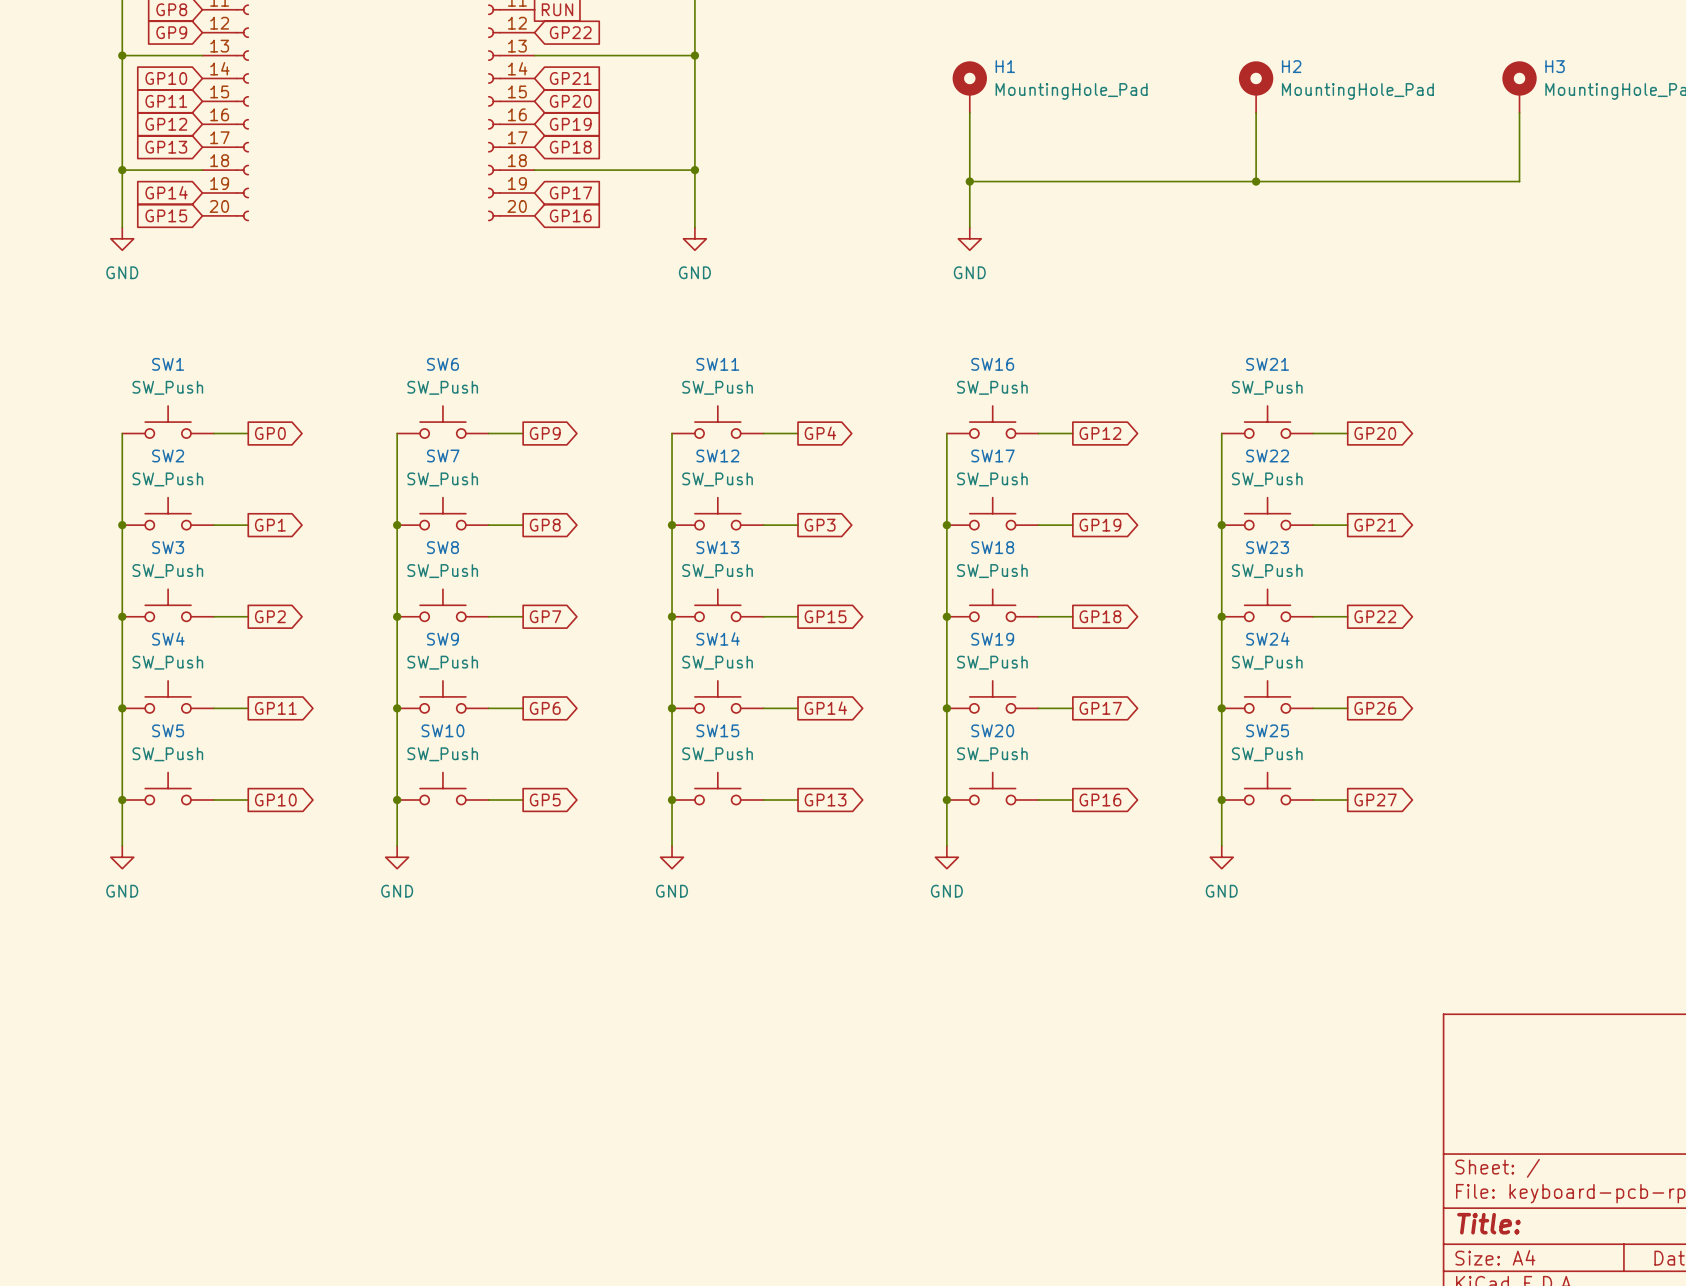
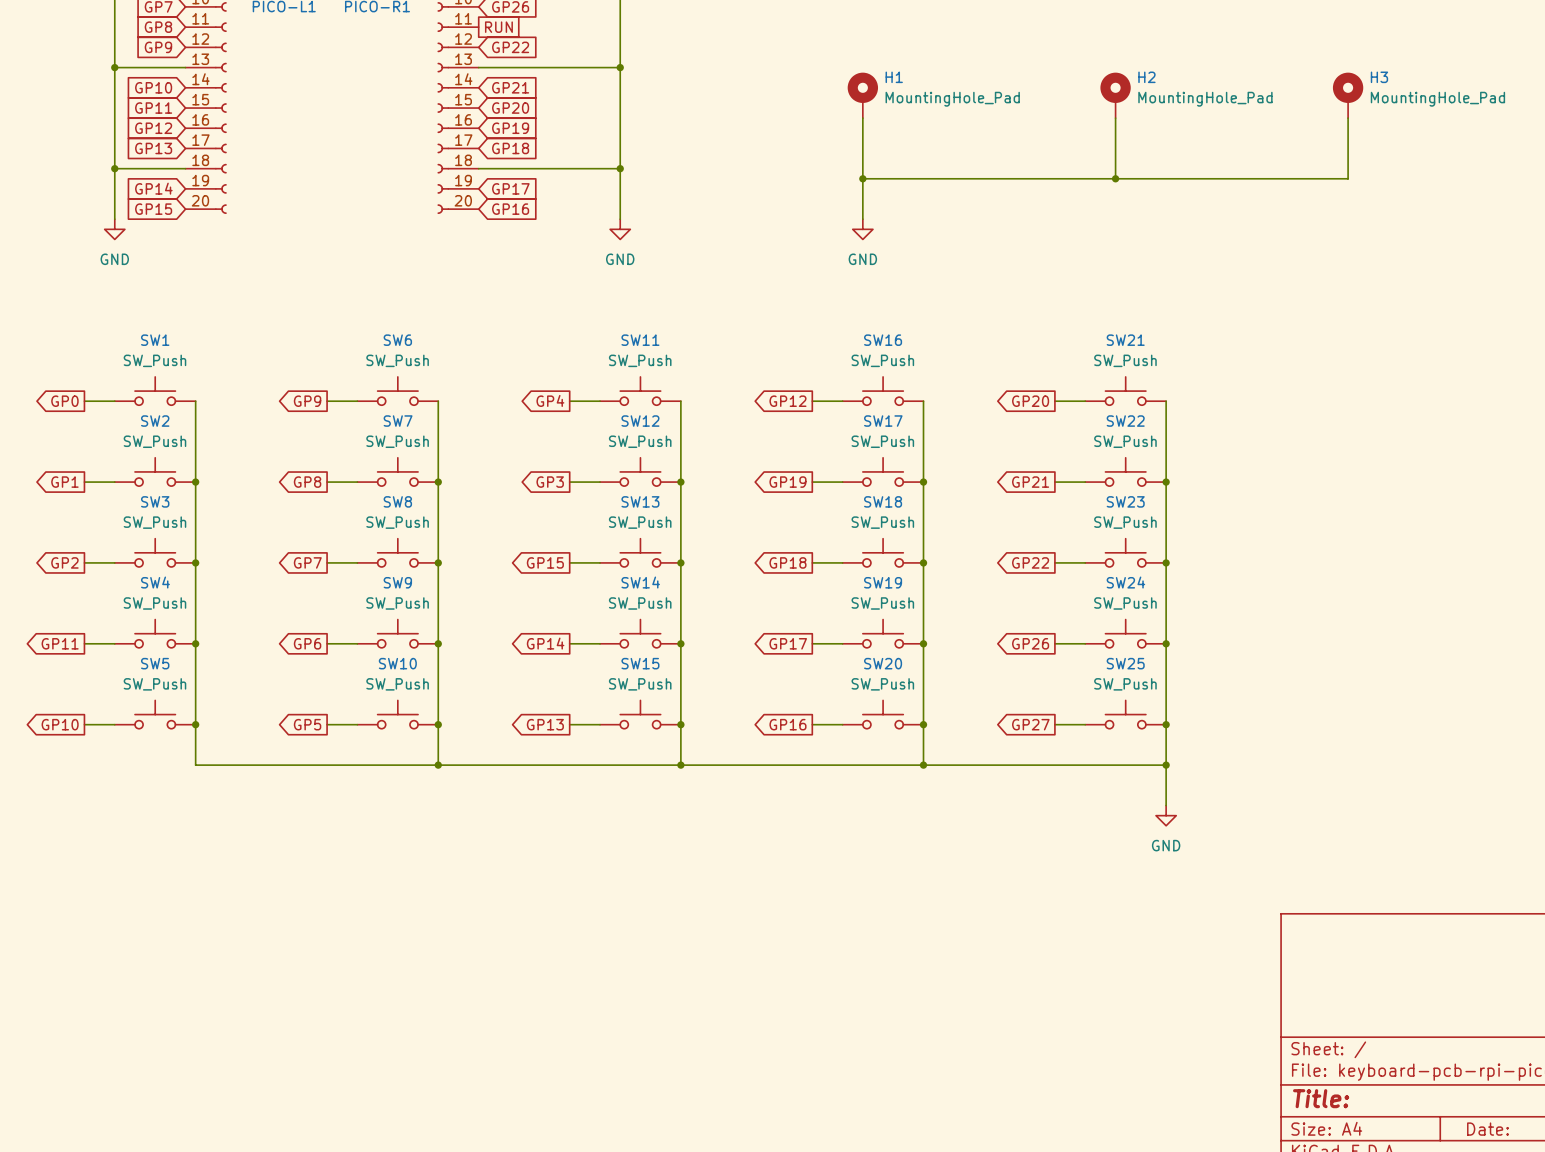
wire: (122, 433) (122, 845) -> (114, 401) (84, 401)
wire: (213, 433) (248, 433) -> (195, 401) (195, 765) (1166, 765)
global label rotation: 0° (270, 433) -> 180° (64, 401)
global label position: GP0 (270, 433) -> GP0 (64, 401)
wire: (397, 433) (397, 845) -> (357, 401) (327, 401)
wire: (488, 433) (523, 433) -> (438, 401) (438, 765)
global label rotation: 0° (545, 433) -> 180° (307, 401)
global label position: GP9 (545, 433) -> GP9 (307, 401)
wire: (672, 433) (672, 845) -> (600, 401) (569, 401)
wire: (763, 433) (797, 433) -> (680, 401) (680, 765)
global label rotation: 0° (820, 433) -> 180° (550, 400)
global label position: GP4 (820, 433) -> GP4 (550, 400)
wire: (946, 433) (946, 845) -> (842, 401) (812, 401)
wire: (1038, 433) (1072, 433) -> (923, 401) (923, 765)
global label rotation: 0° (1100, 433) -> 180° (787, 401)
global label position: GP12 (1100, 433) -> GP12 (787, 401)
wire: (1221, 433) (1221, 845) -> (1085, 401) (1054, 401)
wire: (1313, 433) (1347, 433) -> (1166, 401) (1166, 805)
global label rotation: 0° (1375, 433) -> 180° (1030, 401)
global label position: GP20 (1375, 433) -> GP20 (1030, 401)
junction: (122, 525) -> none
wire: (213, 525) (248, 525) -> (84, 482) (114, 482)
junction: none -> (195, 482)
global label rotation: 0° (270, 525) -> 180° (64, 482)
global label position: GP1 (270, 525) -> GP1 (64, 482)
junction: (397, 525) -> none
wire: (488, 525) (523, 525) -> (327, 482) (357, 482)
junction: none -> (438, 482)
global label rotation: 0° (545, 525) -> 180° (307, 482)
global label position: GP8 (545, 525) -> GP8 (307, 482)
junction: (672, 525) -> none
wire: (763, 525) (797, 525) -> (569, 482) (600, 482)
junction: none -> (680, 482)
global label rotation: 0° (820, 525) -> 180° (550, 482)
global label position: GP3 (820, 525) -> GP3 (550, 482)
junction: (946, 525) -> none
wire: (1038, 525) (1072, 525) -> (812, 482) (842, 482)
junction: none -> (923, 482)
global label rotation: 0° (1100, 525) -> 180° (787, 482)
global label position: GP19 (1100, 525) -> GP19 (787, 482)
junction: (1221, 525) -> none
wire: (1313, 525) (1347, 525) -> (1054, 482) (1085, 482)
junction: none -> (1166, 482)
global label rotation: 0° (1375, 525) -> 180° (1030, 482)
global label position: GP21 (1375, 525) -> GP21 (1030, 482)
junction: (122, 616) -> none
wire: (213, 616) (248, 616) -> (84, 562) (114, 562)
junction: none -> (195, 562)
global label rotation: 0° (270, 616) -> 180° (64, 562)
global label position: GP2 (270, 616) -> GP2 (64, 562)
junction: (397, 616) -> none
wire: (488, 616) (523, 616) -> (327, 562) (357, 562)
junction: none -> (438, 562)
global label rotation: 0° (545, 616) -> 180° (307, 562)
global label position: GP7 (545, 616) -> GP7 (307, 562)
junction: (672, 616) -> none
wire: (763, 616) (797, 616) -> (569, 562) (600, 562)
junction: none -> (680, 562)
global label rotation: 0° (825, 616) -> 180° (545, 562)
global label position: GP15 (825, 616) -> GP15 (545, 562)
junction: (946, 616) -> none
wire: (1038, 616) (1072, 616) -> (812, 562) (842, 562)
junction: none -> (923, 562)
global label rotation: 0° (1100, 616) -> 180° (787, 562)
global label position: GP18 (1100, 616) -> GP18 (787, 562)
junction: (1221, 616) -> none
wire: (1313, 616) (1347, 616) -> (1054, 562) (1085, 562)
junction: none -> (1166, 562)
global label rotation: 0° (1375, 616) -> 180° (1030, 562)
global label position: GP22 (1375, 616) -> GP22 (1030, 562)
junction: (122, 708) -> none
wire: (213, 708) (248, 708) -> (84, 643) (114, 643)
junction: none -> (195, 643)
global label rotation: 0° (275, 708) -> 180° (60, 643)
global label position: GP11 (275, 708) -> GP11 (60, 643)
junction: (397, 708) -> none
wire: (488, 708) (523, 708) -> (327, 643) (357, 643)
junction: none -> (438, 643)
global label rotation: 0° (545, 708) -> 180° (307, 643)
global label position: GP6 (545, 708) -> GP6 (307, 643)
junction: (672, 708) -> none
wire: (763, 708) (797, 708) -> (569, 643) (600, 643)
junction: none -> (680, 643)
global label rotation: 0° (825, 708) -> 180° (545, 643)
global label position: GP14 (825, 708) -> GP14 (545, 643)
junction: (946, 708) -> none
wire: (1038, 708) (1072, 708) -> (812, 643) (842, 643)
junction: none -> (923, 643)
global label rotation: 0° (1100, 708) -> 180° (788, 643)
global label position: GP17 (1100, 708) -> GP17 (788, 643)
junction: (1221, 708) -> none
wire: (1313, 708) (1347, 708) -> (1054, 643) (1085, 643)
junction: none -> (1166, 643)
global label rotation: 0° (1375, 708) -> 180° (1030, 643)
global label position: GP26 (1375, 708) -> GP26 (1030, 643)
junction: (122, 800) -> none
wire: (213, 800) (248, 800) -> (84, 724) (114, 724)
junction: none -> (195, 724)
global label rotation: 0° (275, 800) -> 180° (60, 724)
global label position: GP10 (275, 800) -> GP10 (60, 724)
junction: (397, 800) -> none
wire: (488, 800) (523, 800) -> (327, 724) (357, 724)
junction: none -> (438, 724)
global label rotation: 0° (545, 800) -> 180° (307, 724)
global label position: GP5 (545, 800) -> GP5 (307, 724)
junction: (672, 800) -> none
wire: (763, 800) (797, 800) -> (569, 724) (600, 724)
junction: none -> (680, 724)
global label rotation: 0° (825, 800) -> 180° (545, 724)
global label position: GP13 (825, 800) -> GP13 (545, 724)
junction: (946, 800) -> none
wire: (1038, 800) (1072, 800) -> (812, 724) (842, 724)
junction: none -> (923, 724)
global label rotation: 0° (1100, 800) -> 180° (787, 724)
global label position: GP16 (1100, 800) -> GP16 (787, 724)
junction: (1221, 800) -> none
wire: (1313, 800) (1347, 800) -> (1054, 724) (1085, 724)
junction: none -> (1166, 724)
global label rotation: 0° (1375, 800) -> 180° (1030, 724)
global label position: GP27 (1375, 800) -> GP27 (1030, 724)
junction: none -> (438, 765)
junction: none -> (680, 765)
junction: none -> (923, 765)
junction: none -> (1166, 765)
power symbol: GND (122, 857) -> none
power symbol: GND (397, 857) -> none
power symbol: GND (672, 857) -> none
power symbol: GND (946, 857) -> none
power symbol position: GND (1221, 857) -> GND (1166, 815)

